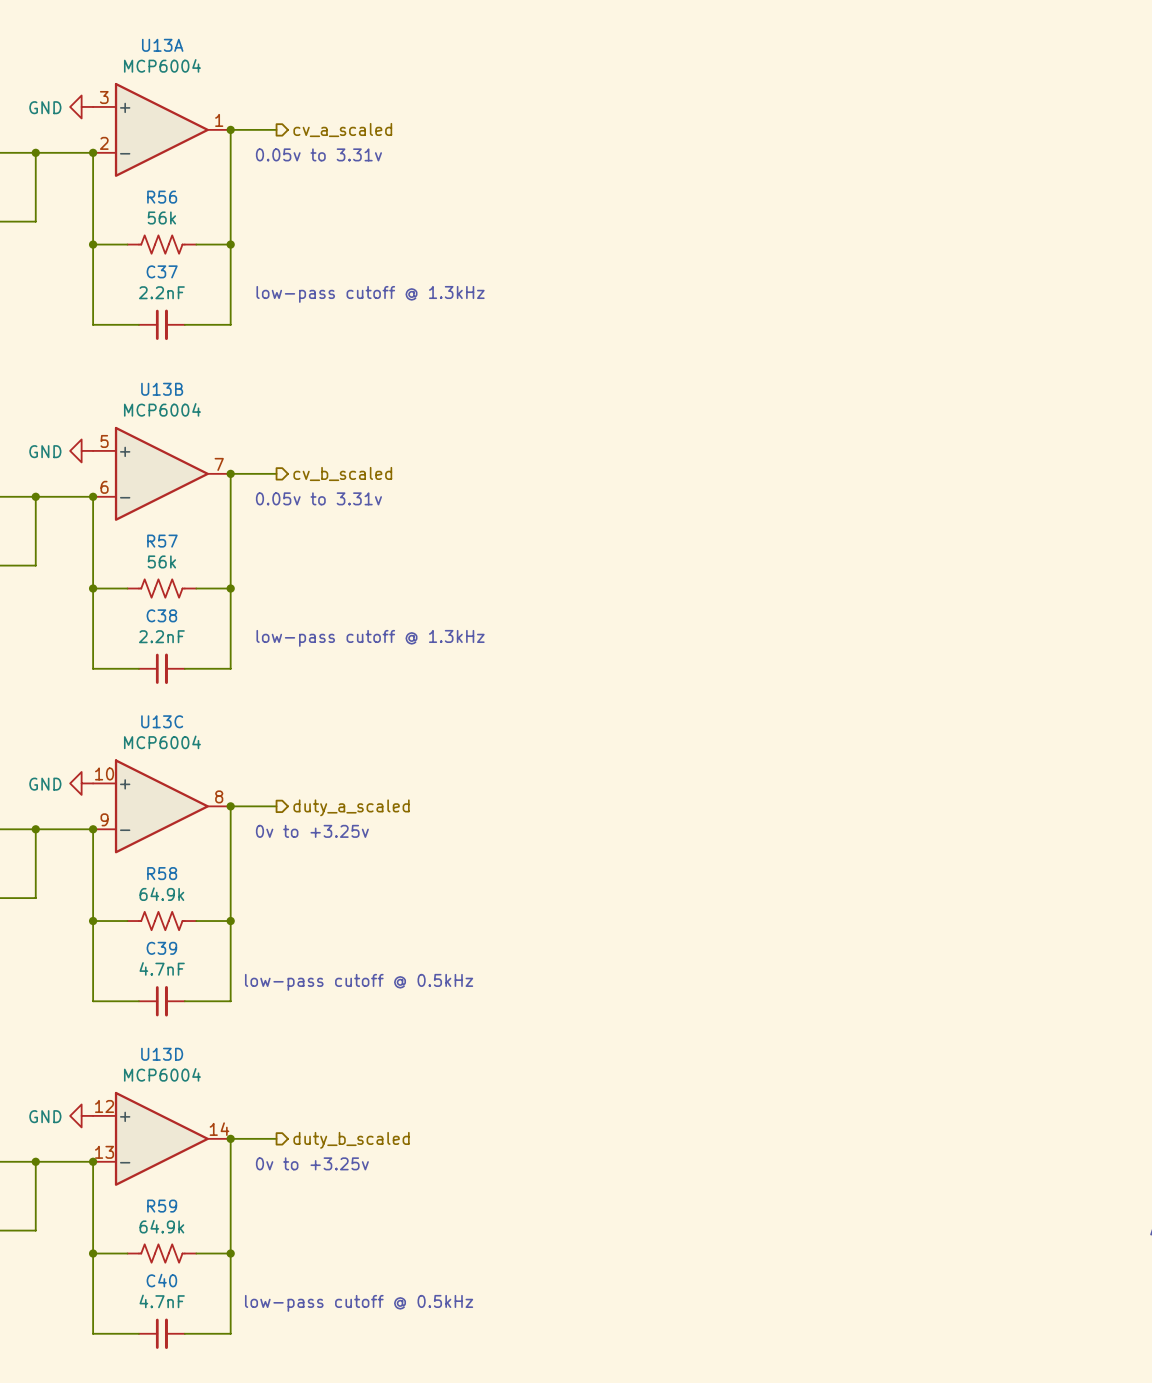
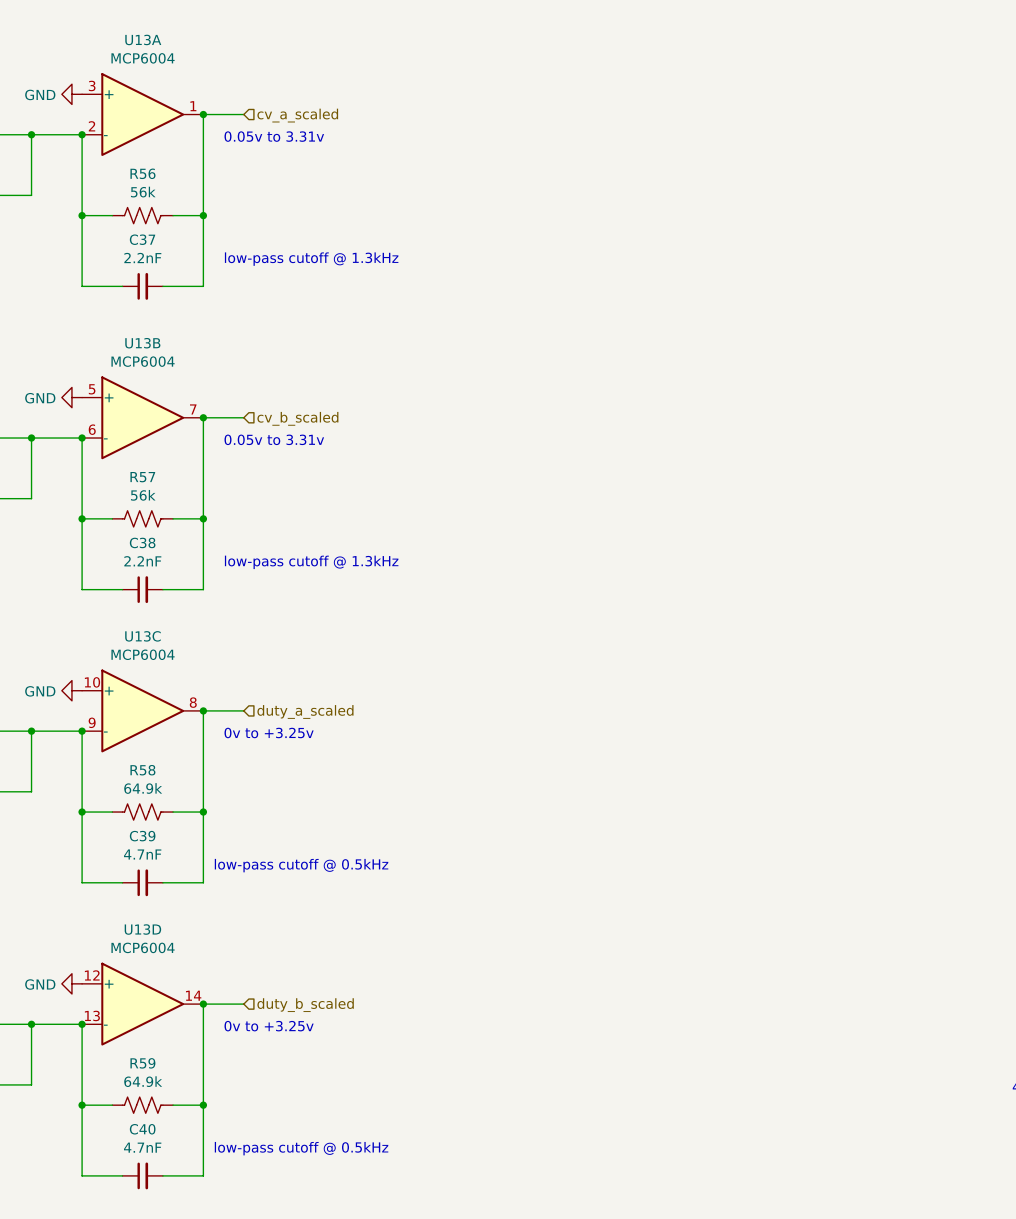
hierarchical label shape: output (342, 130) -> input (297, 115)
hierarchical label shape: output (342, 473) -> input (297, 418)
hierarchical label shape: output (351, 807) -> input (305, 711)
hierarchical label shape: output (351, 1140) -> input (305, 1005)

